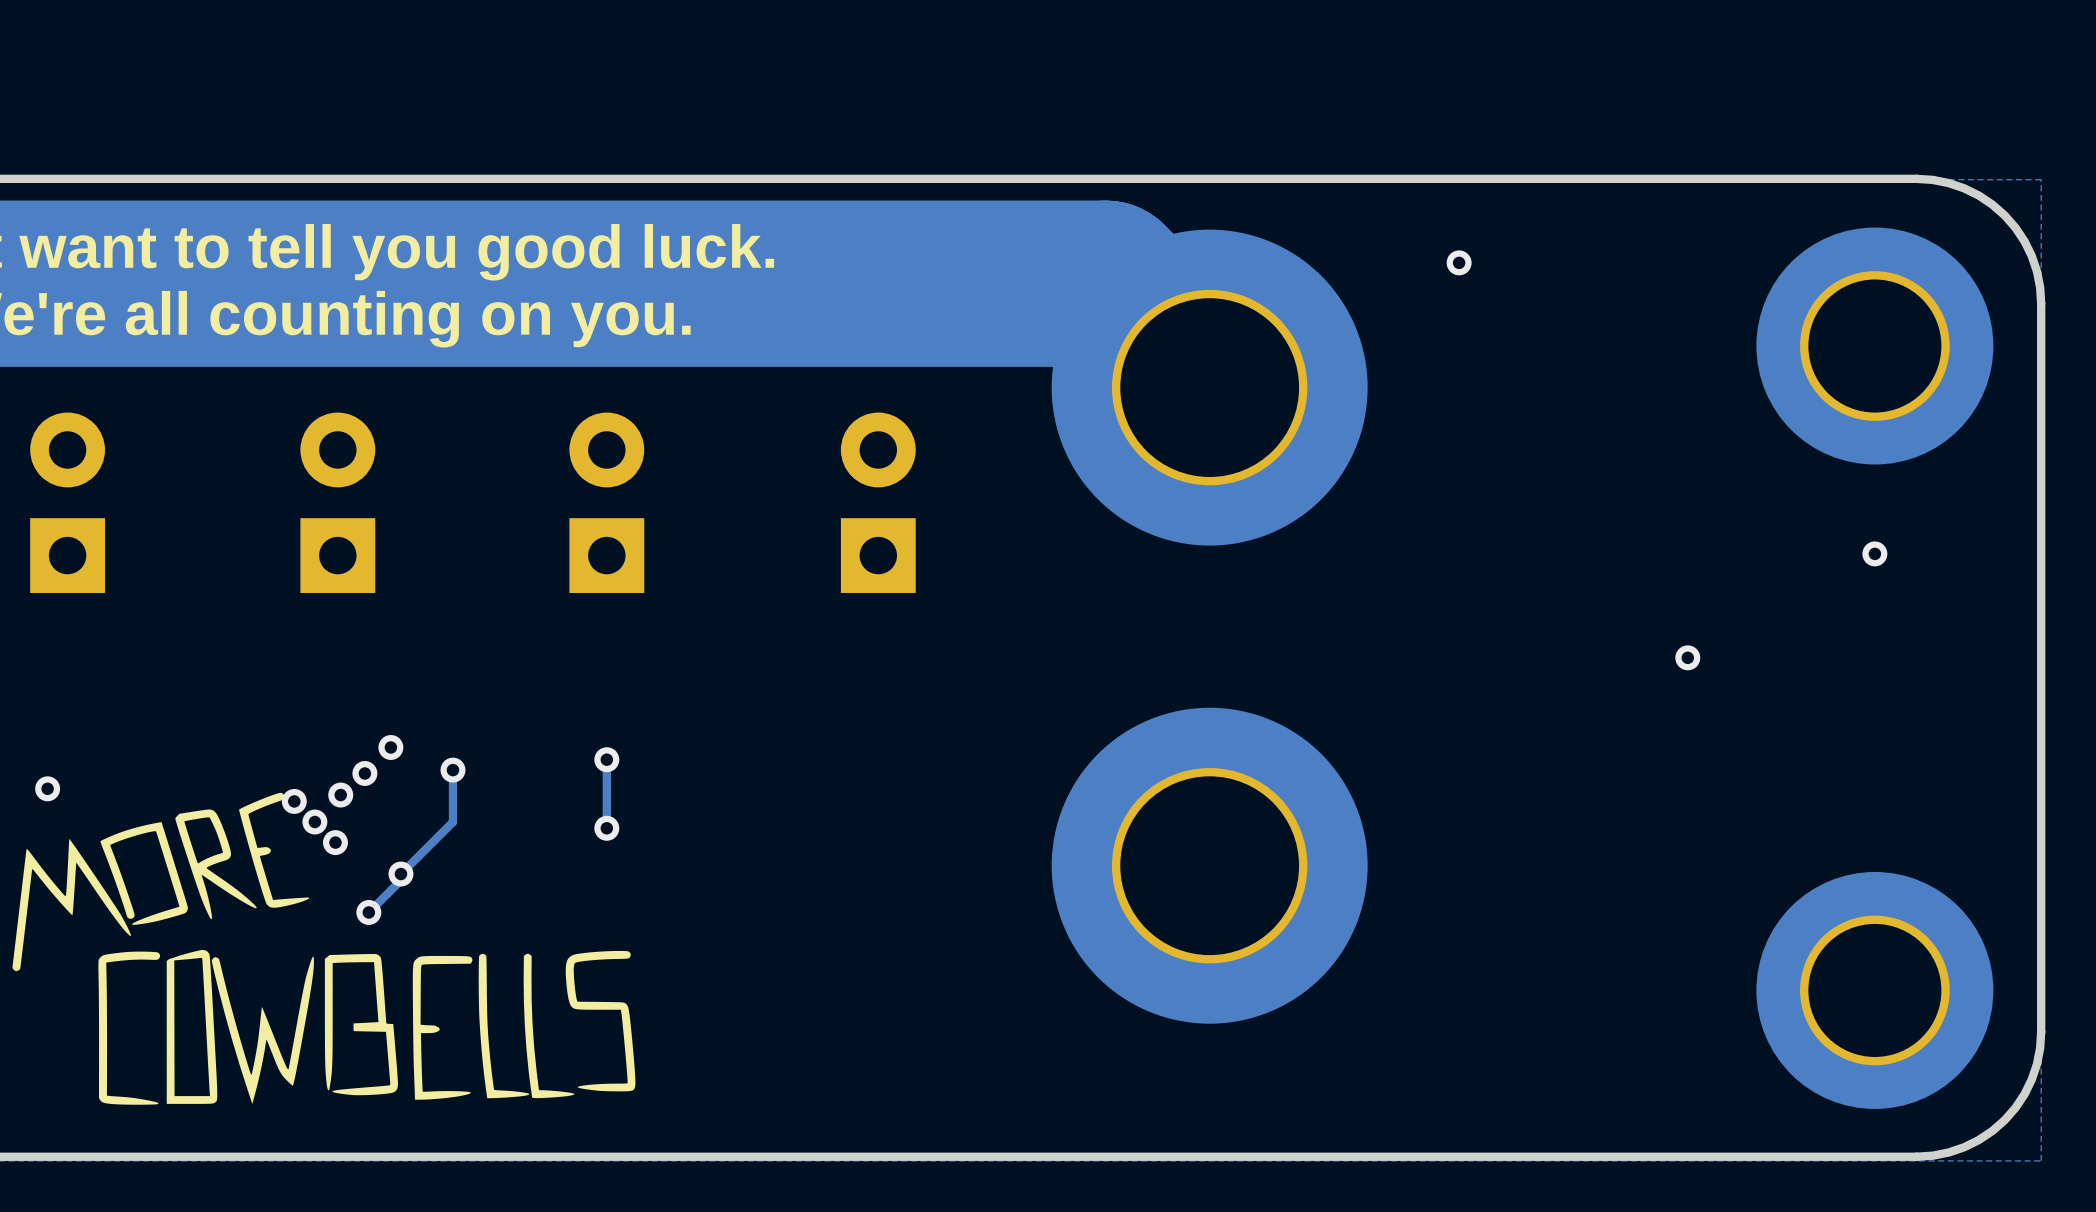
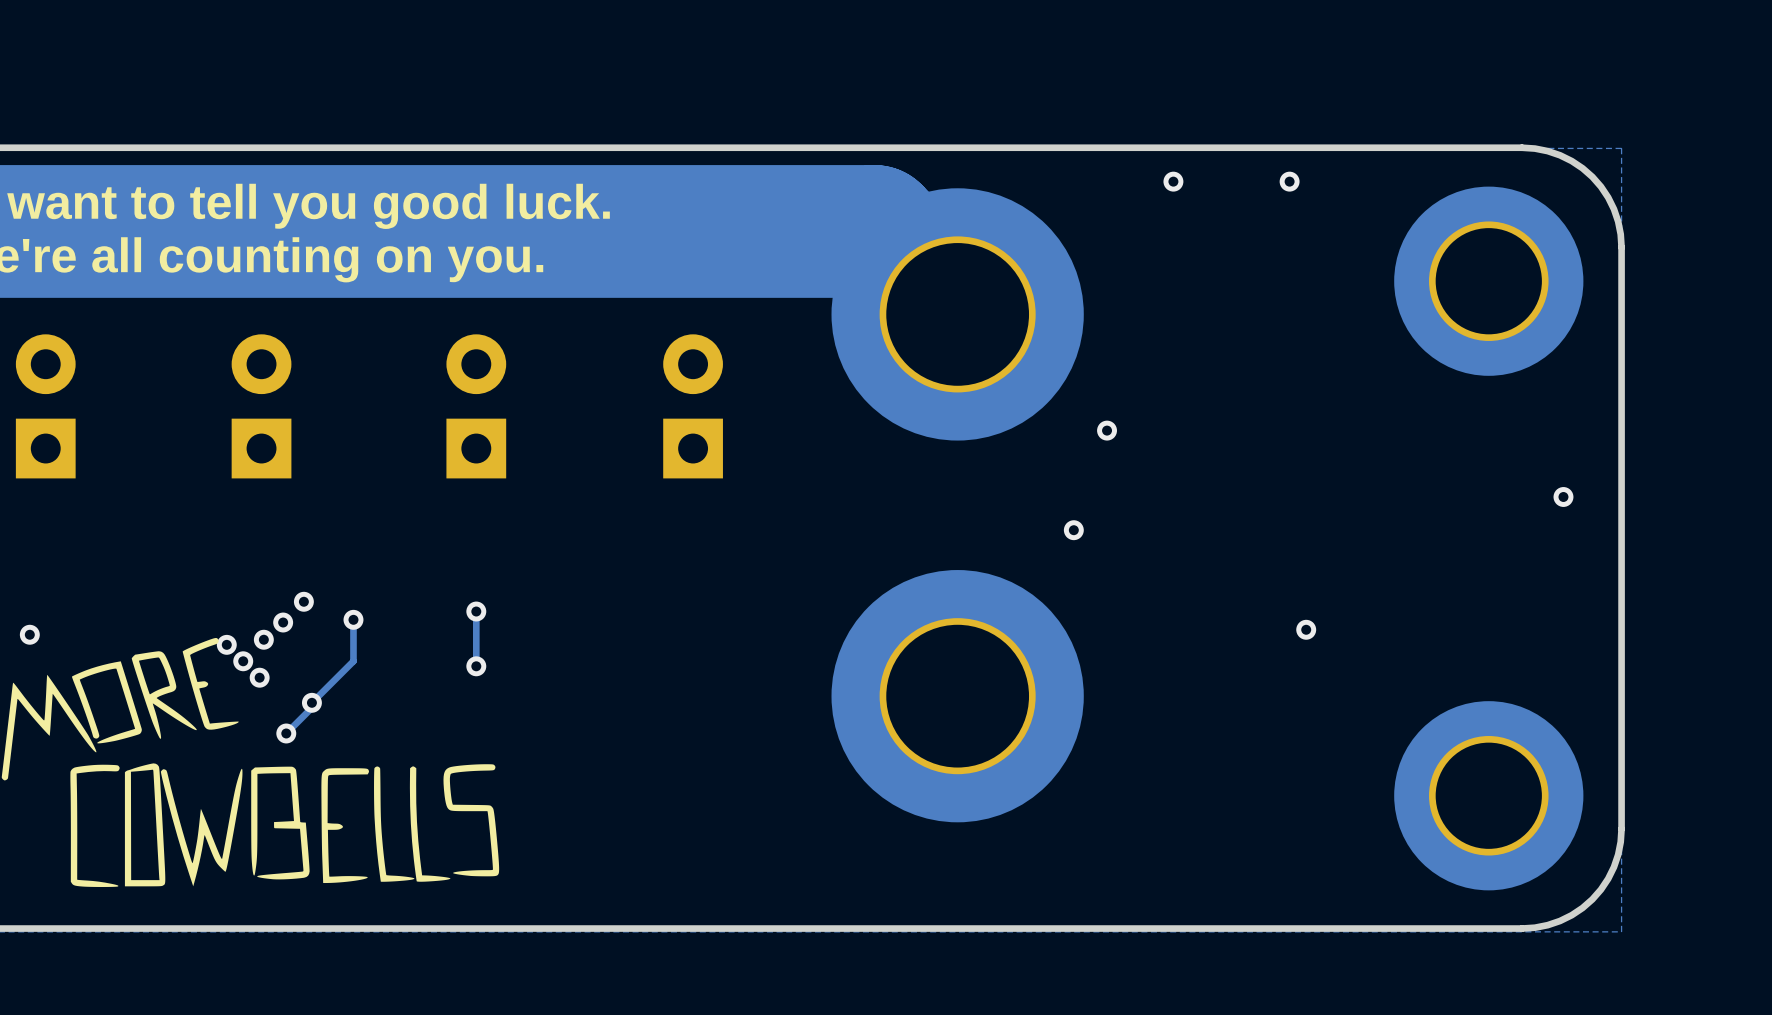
via: none -> (1289, 181)
via position: (1459, 262) -> (1173, 181)
via: none -> (1107, 430)
via position: (1874, 553) -> (1563, 496)
via: none -> (1073, 530)
via position: (1687, 657) -> (1306, 629)

